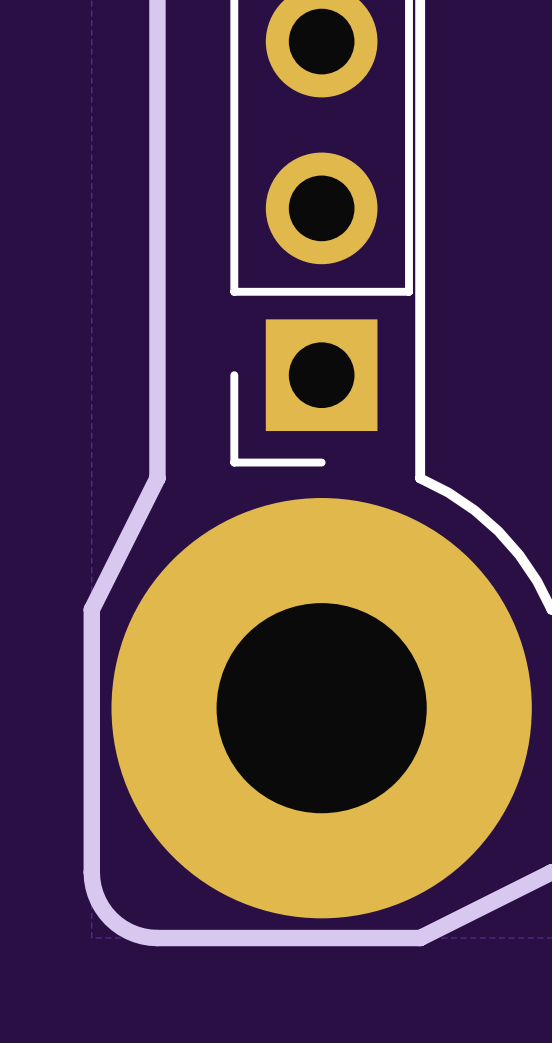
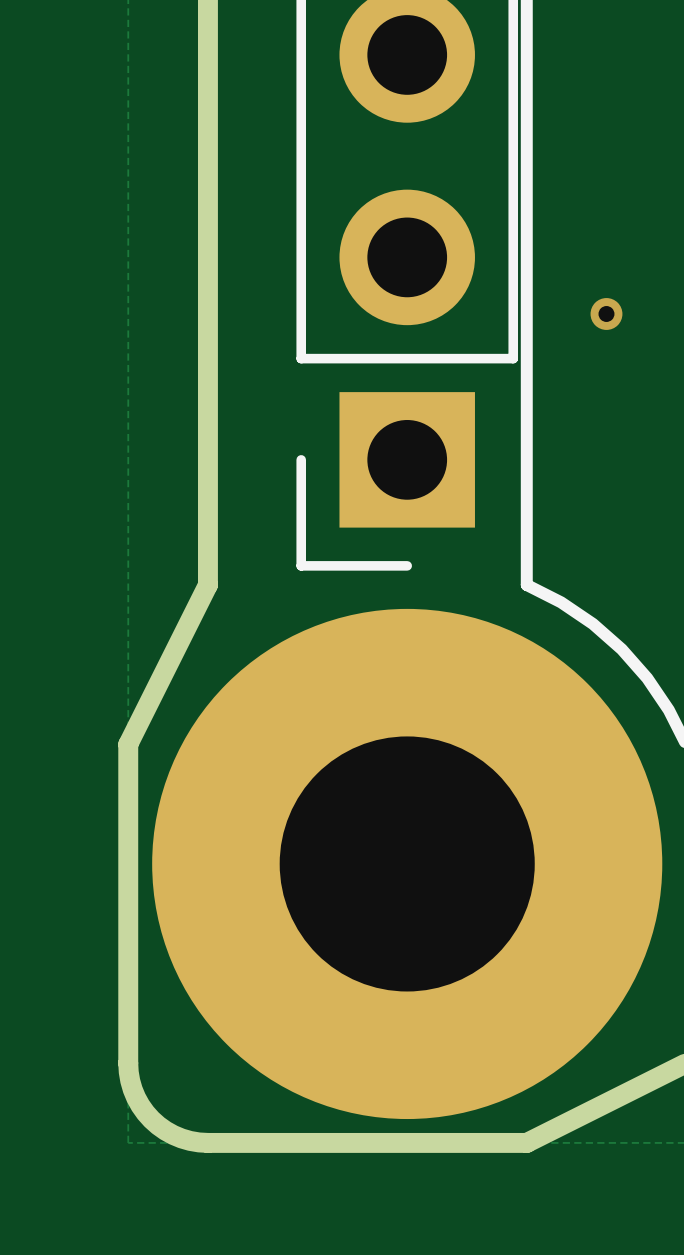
via: none -> (606, 313)

